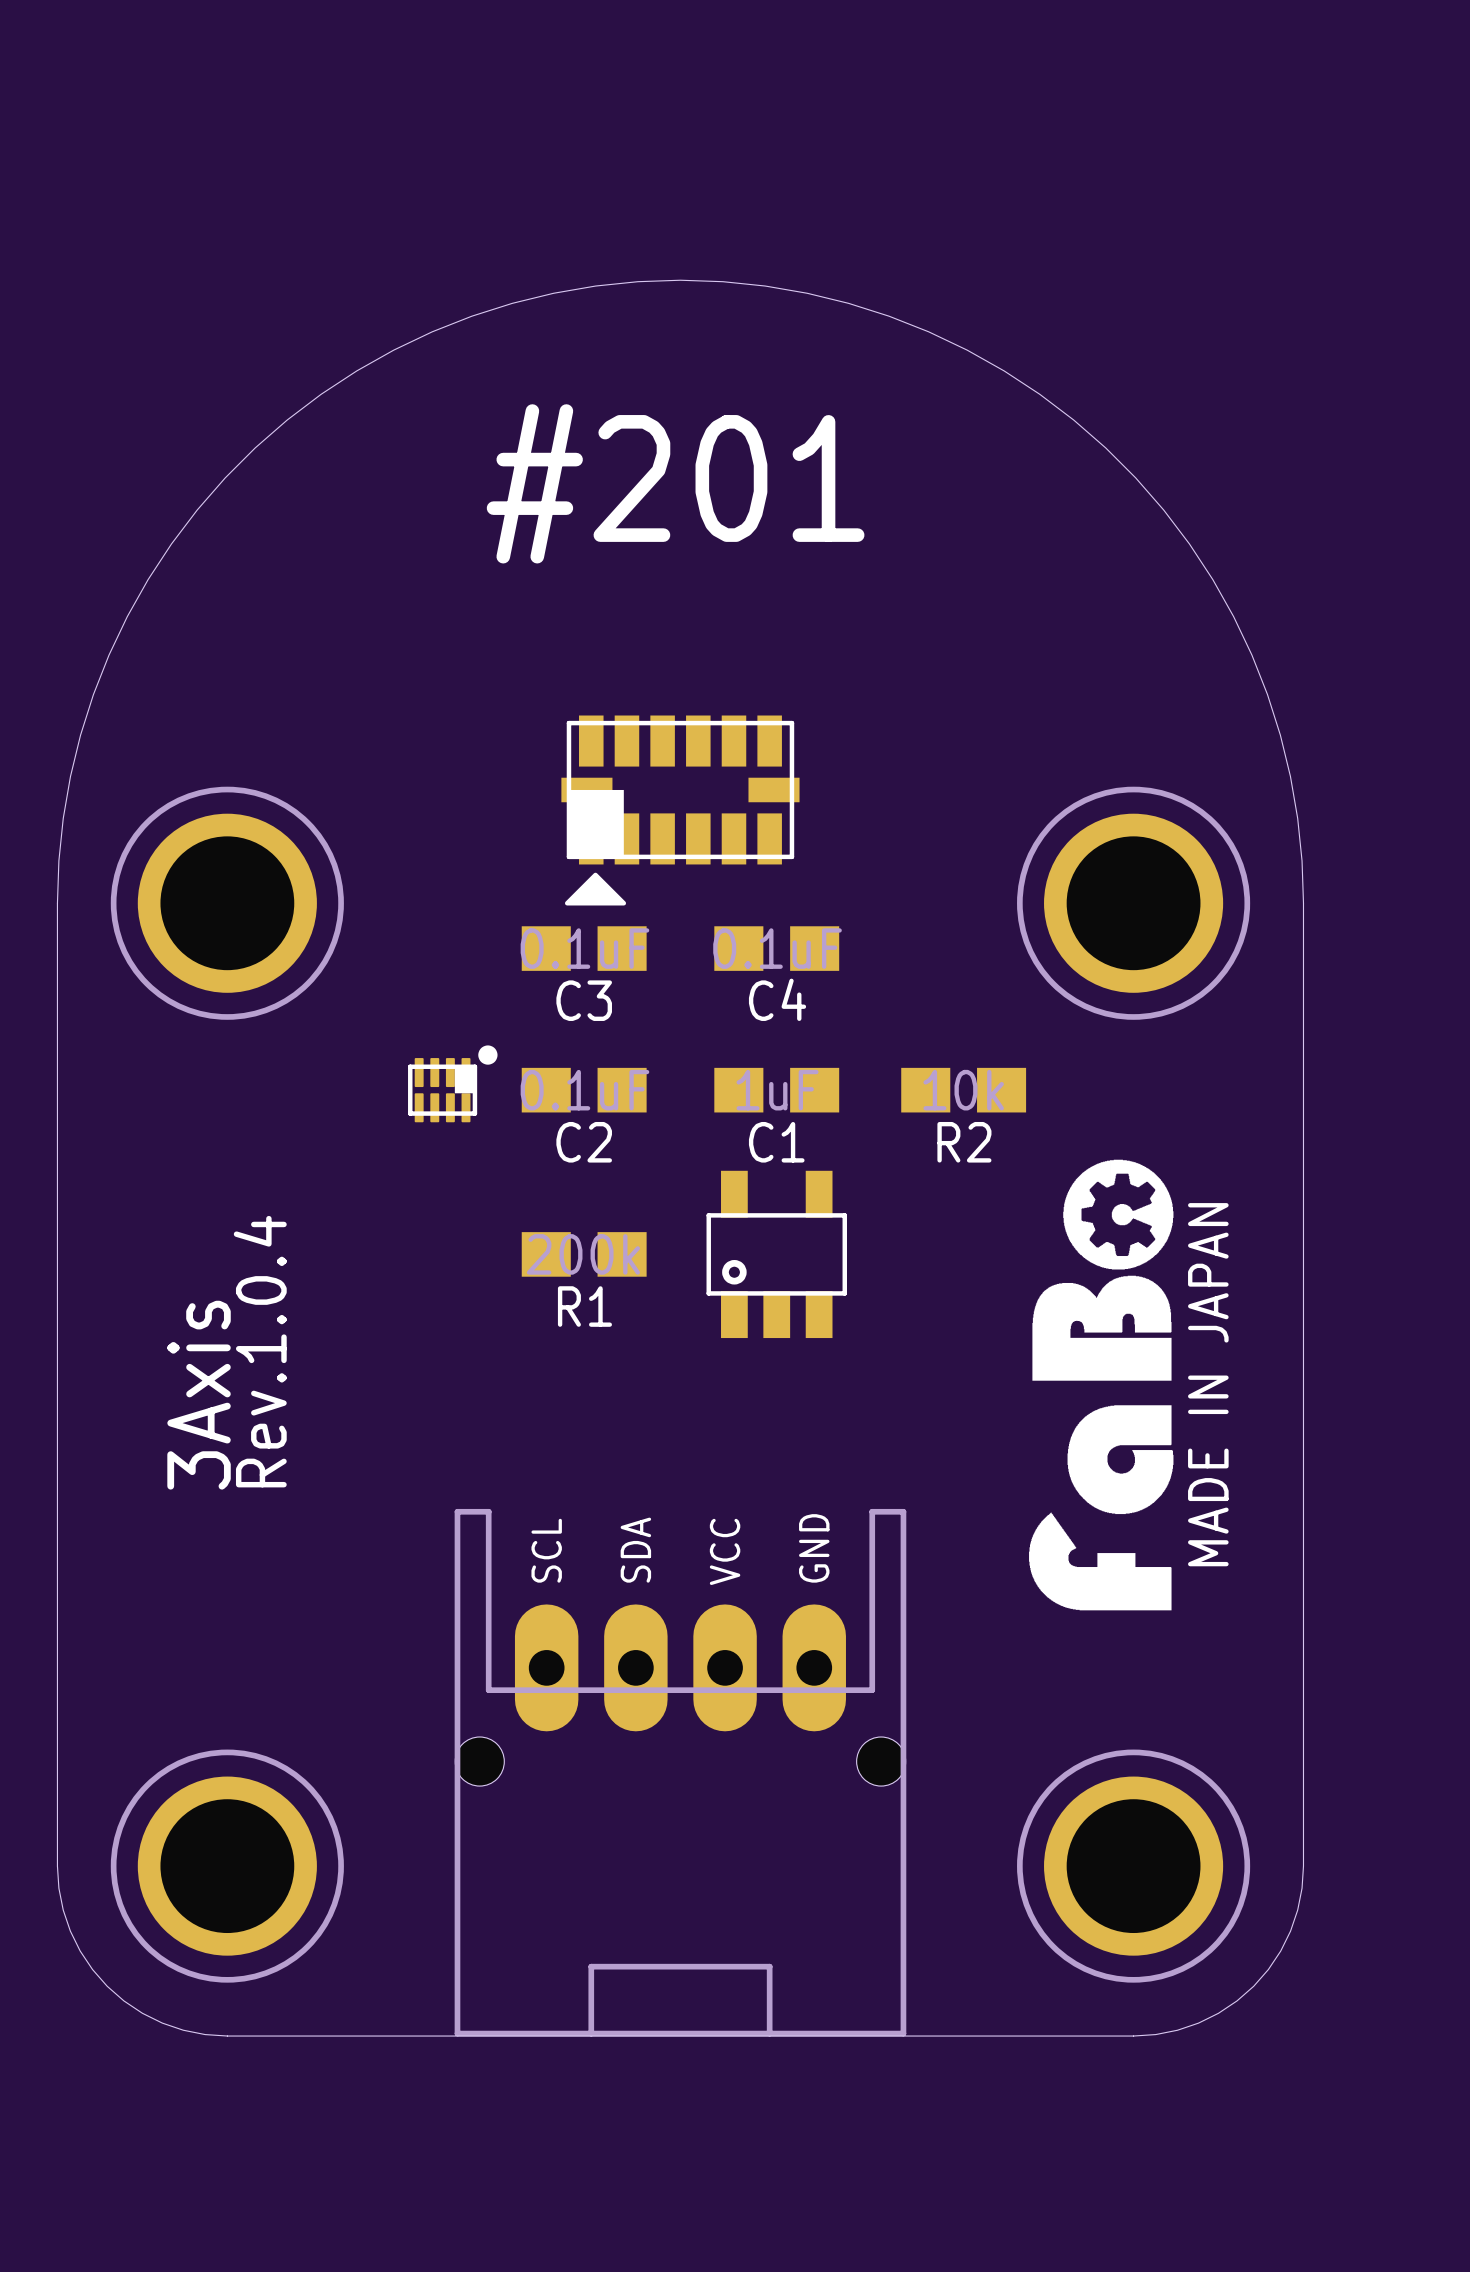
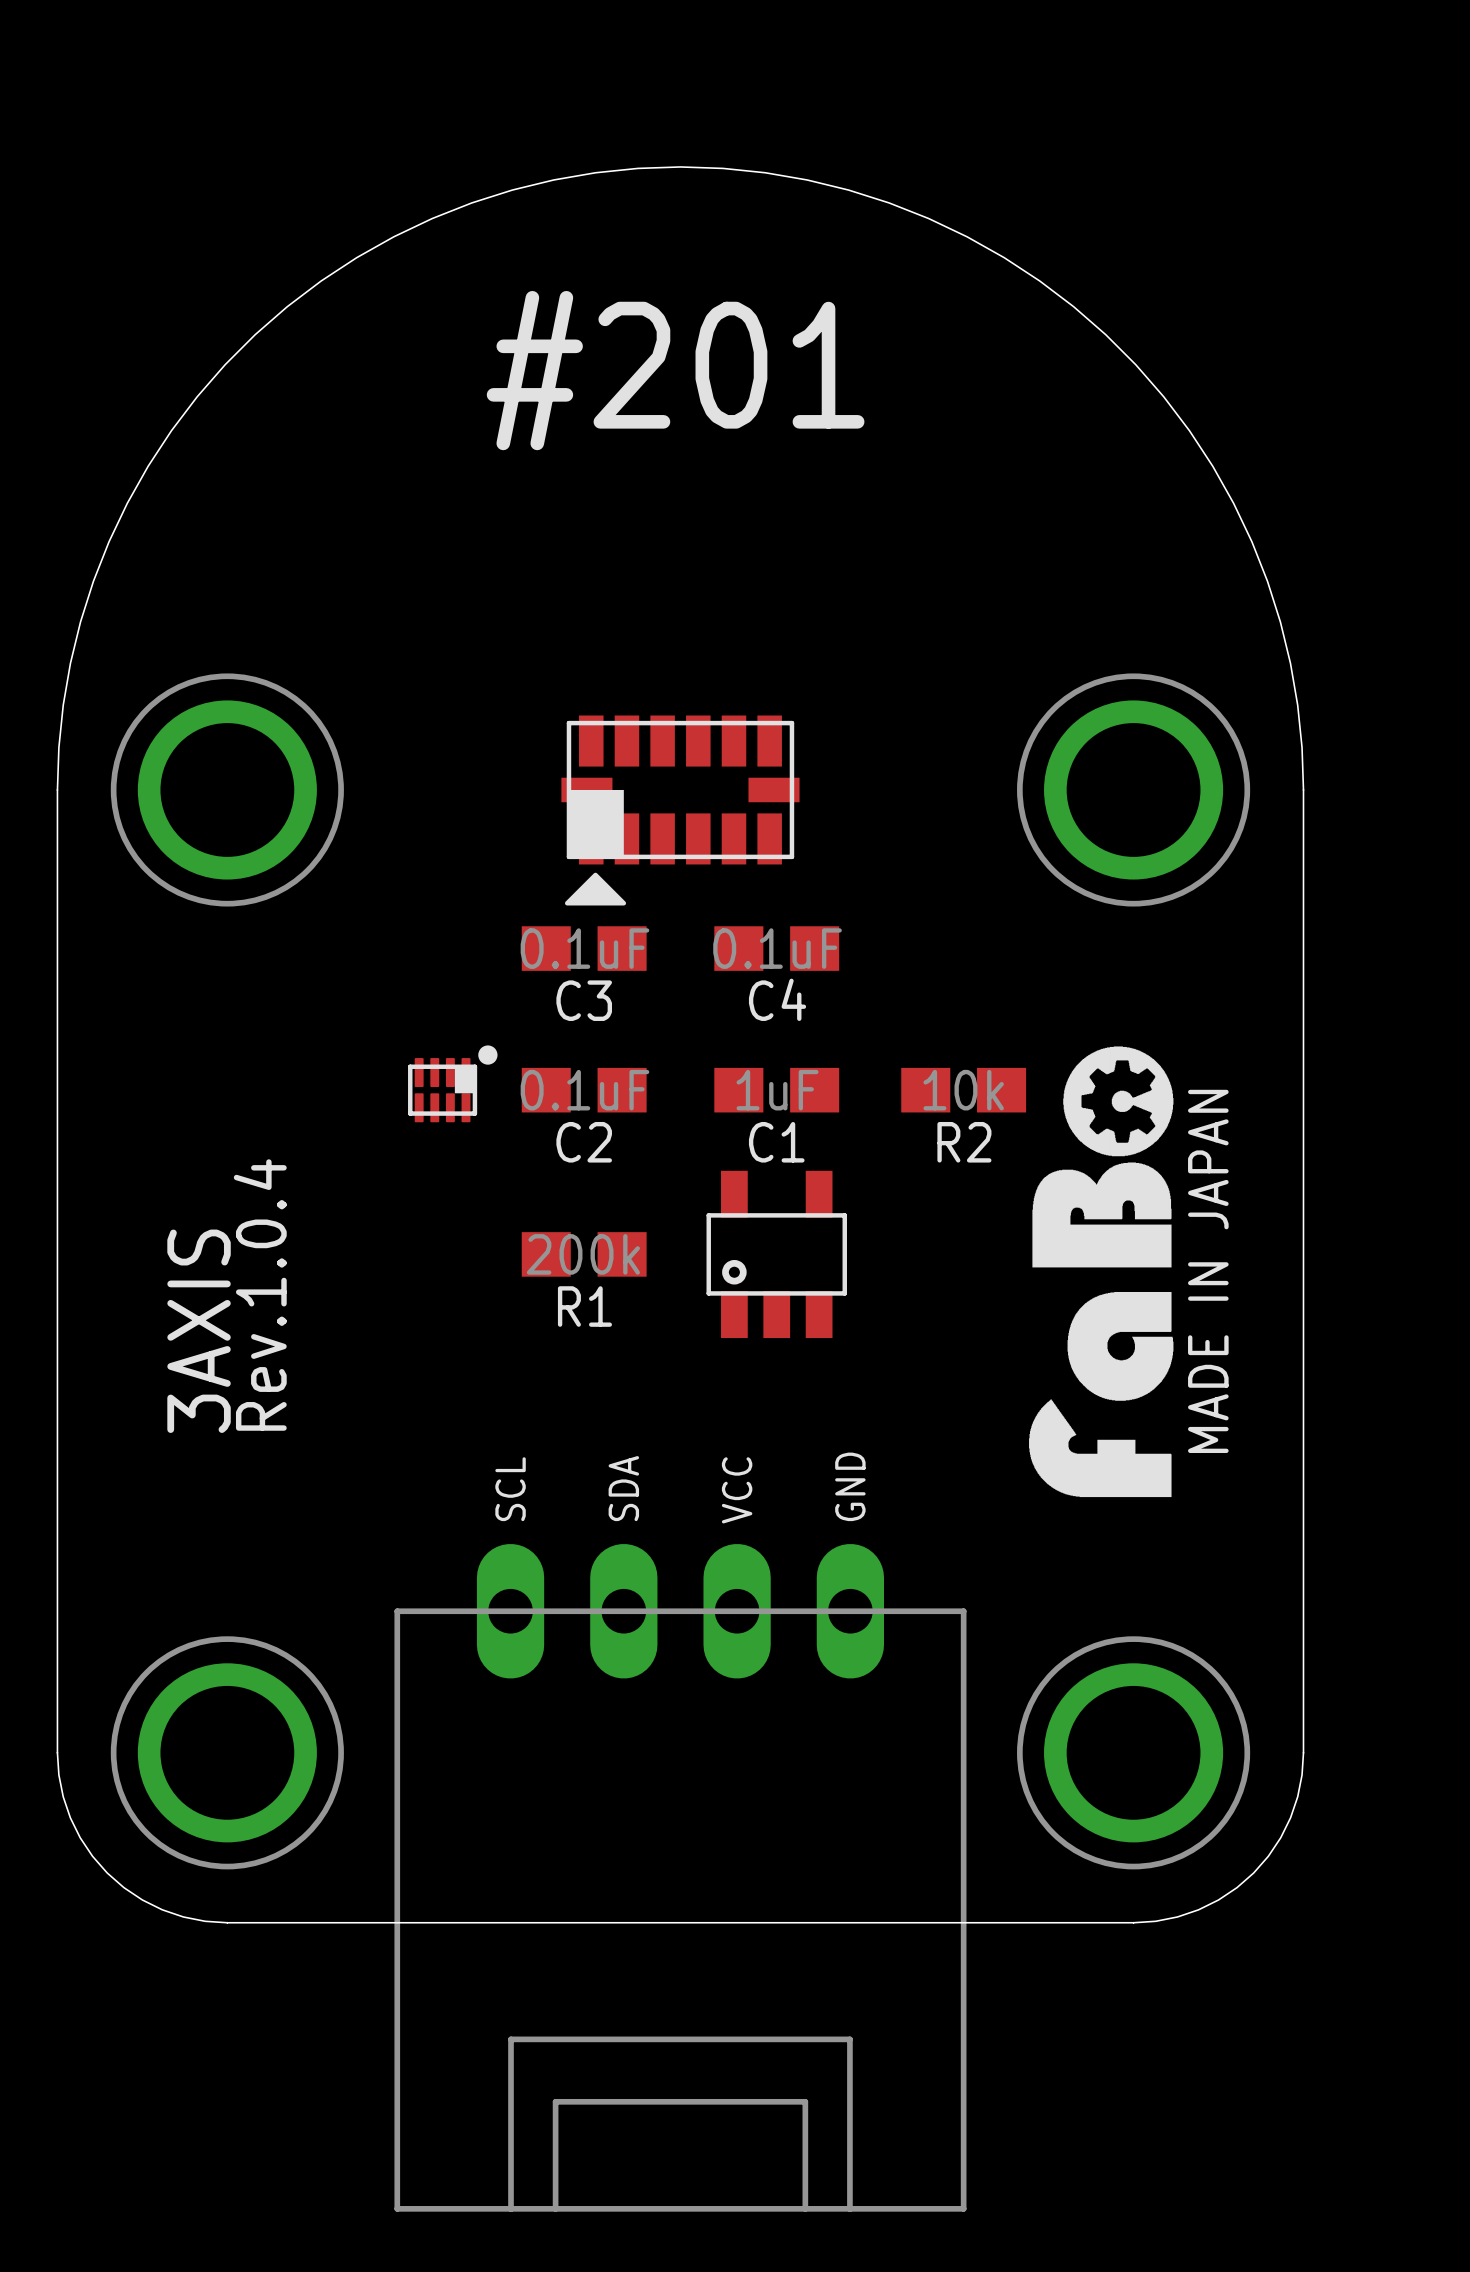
part footprint: [57, 280, 1304, 2037] -> [57, 166, 1304, 2212]
text position: #201 (675, 483) -> #201 (675, 370)
text: none -> 3AXIS (199, 1331)
text position: Rev.1.0.4 (260, 1351) -> Rev.1.0.4 (260, 1295)
text position: MADE IN JAPAN (1208, 1384) -> MADE IN JAPAN (1208, 1271)
drawing position: (1101, 1385) -> (1101, 1271)
text: 3Axis (199, 1395) -> none

